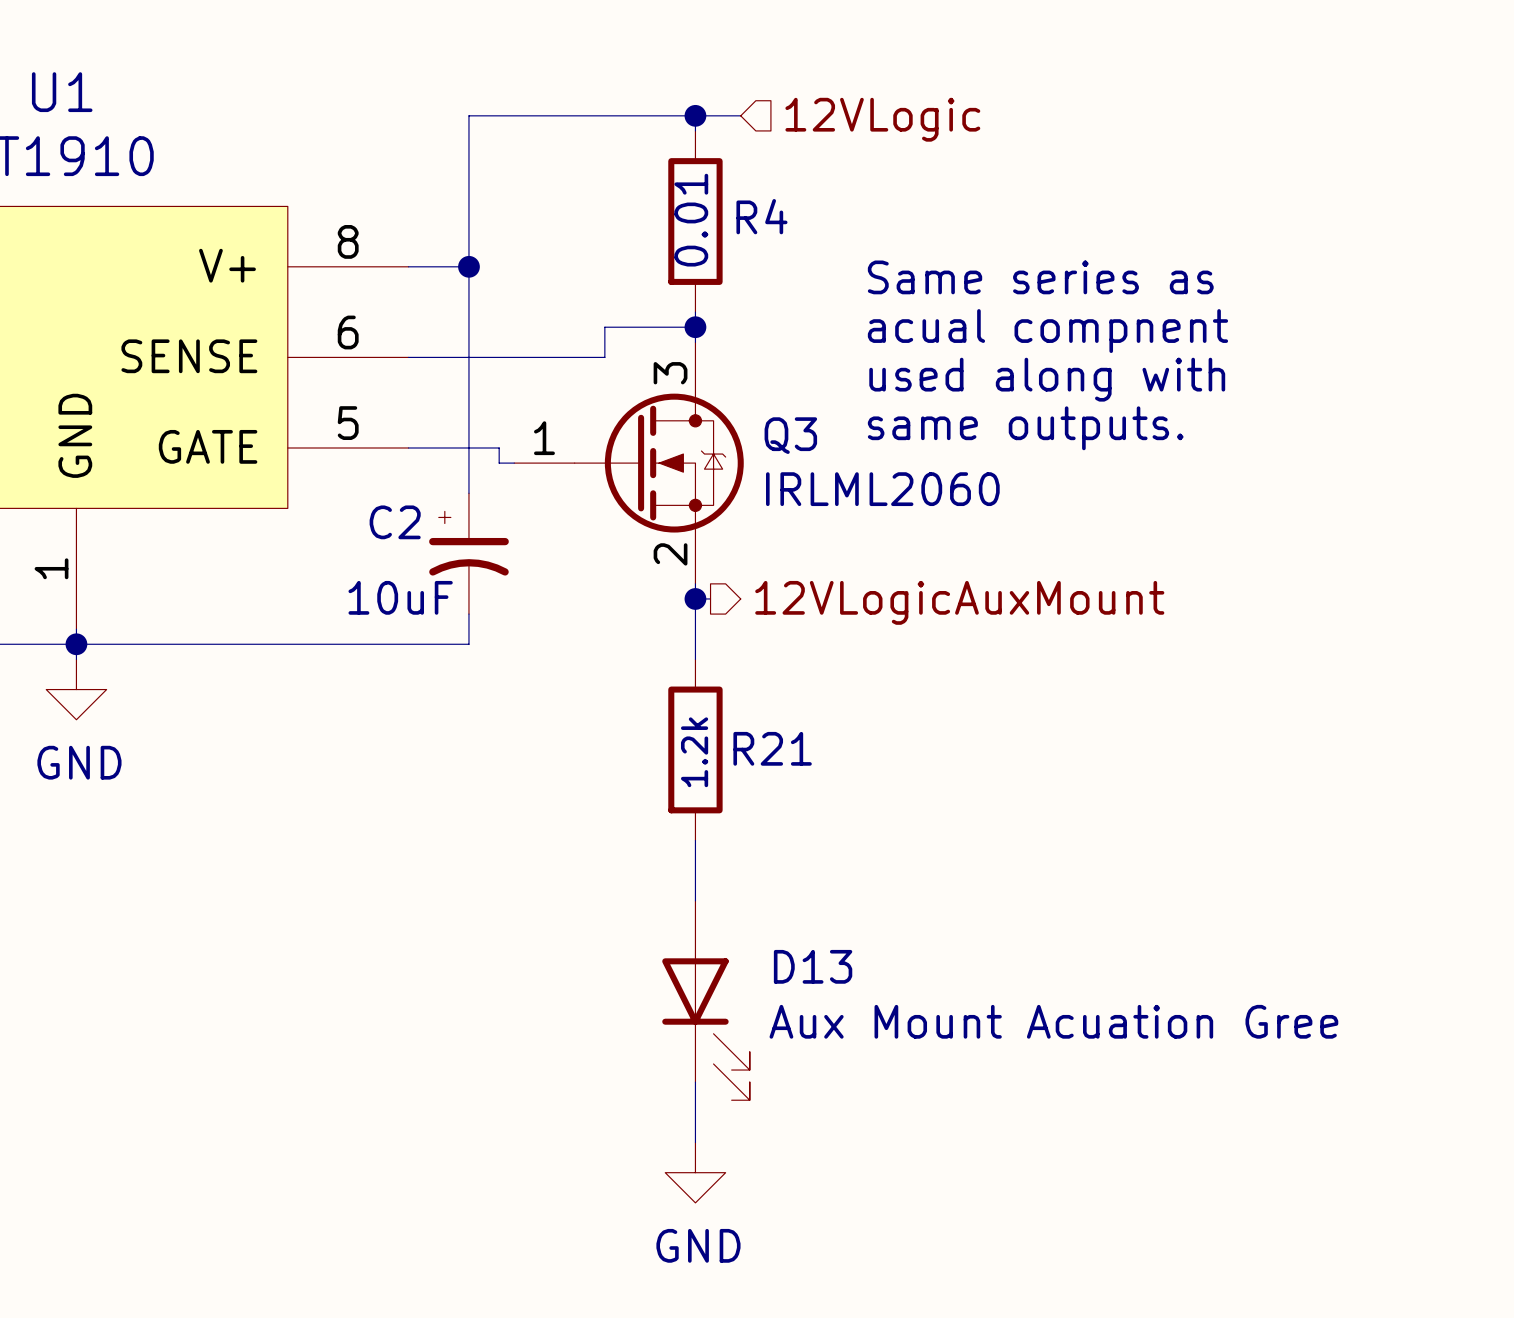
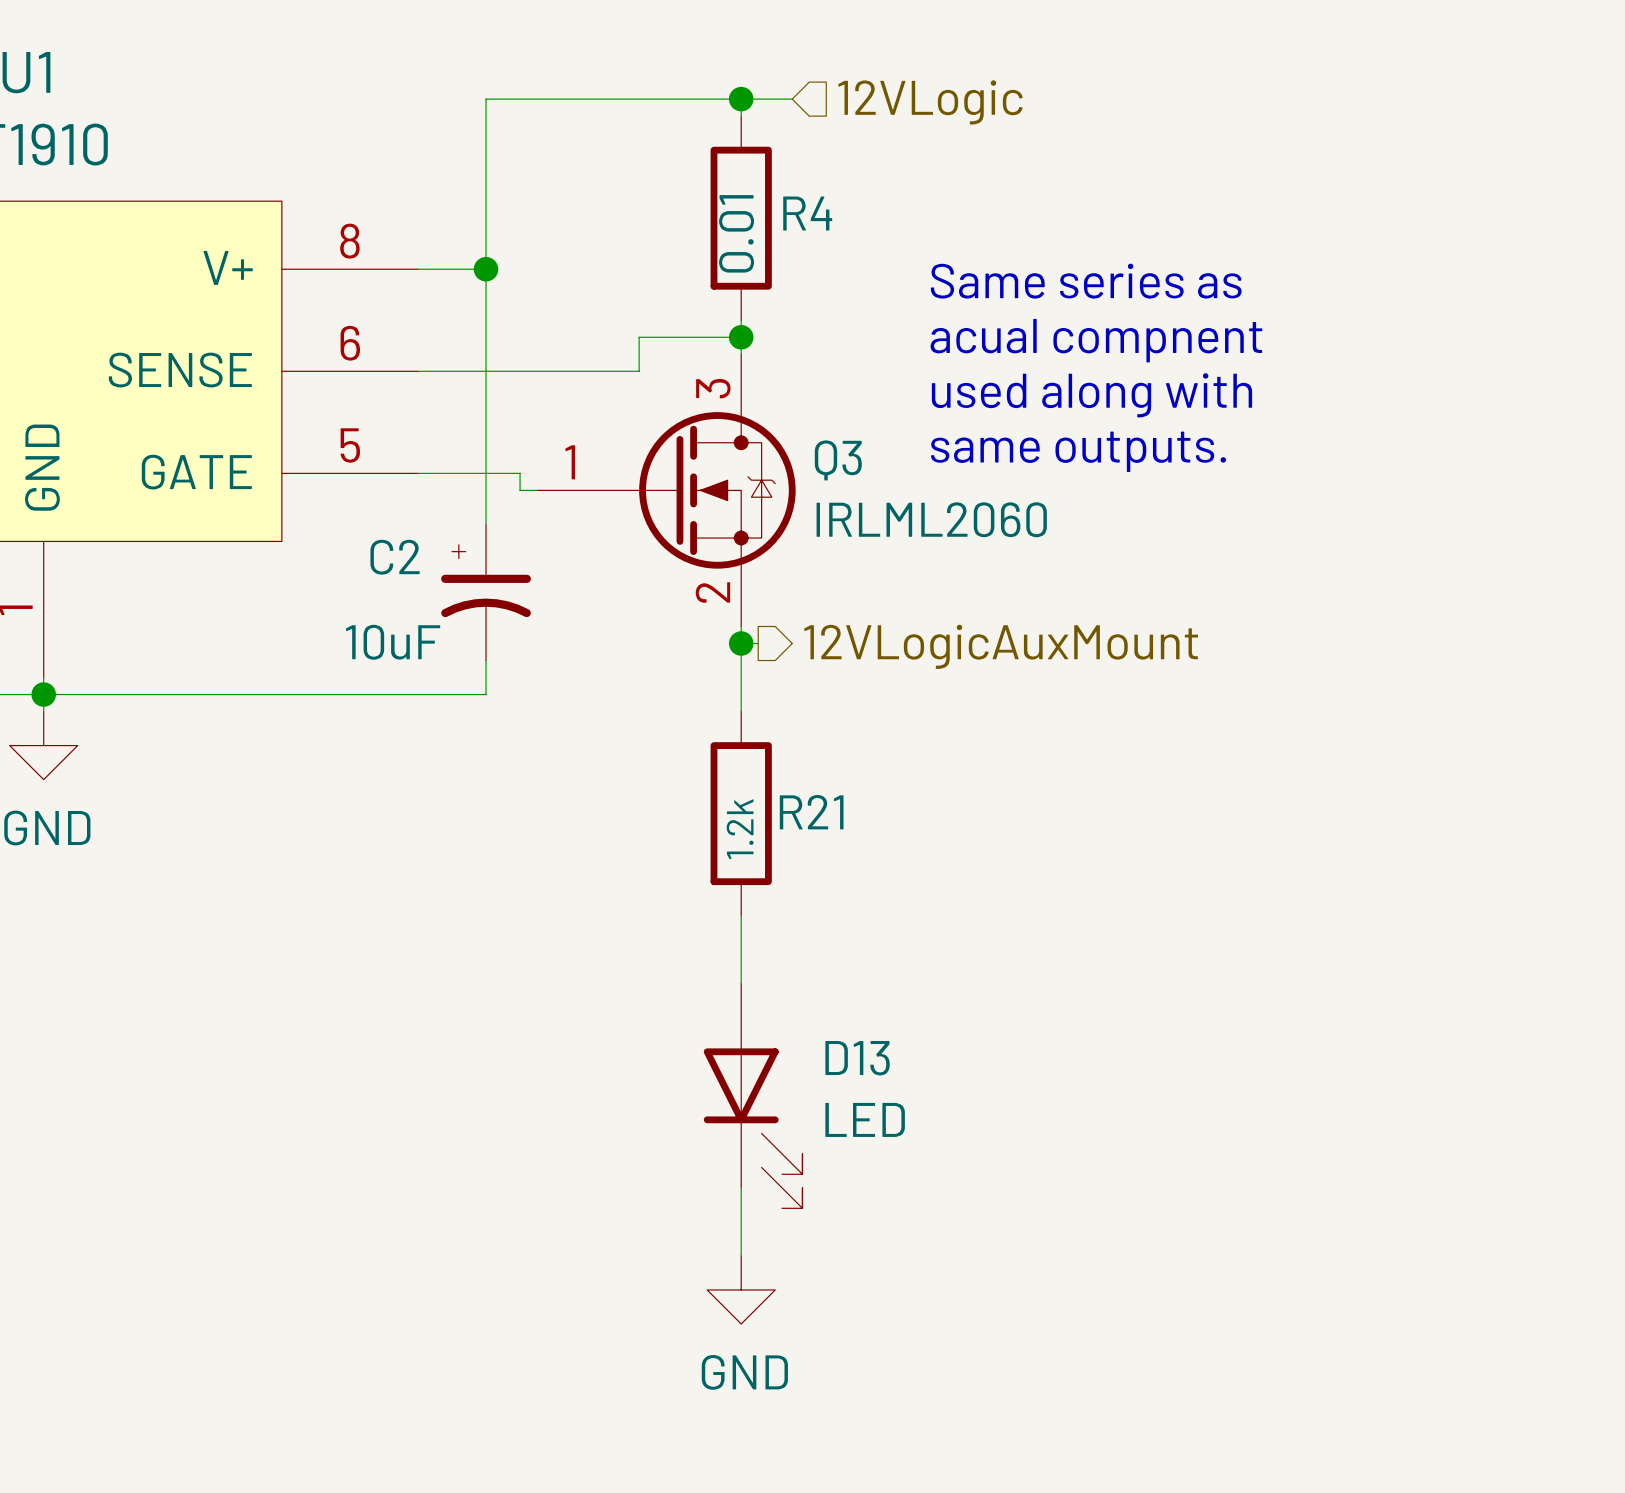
D13 value: Aux Mount Acuation Gree (1053, 1021) -> LED (865, 1119)

